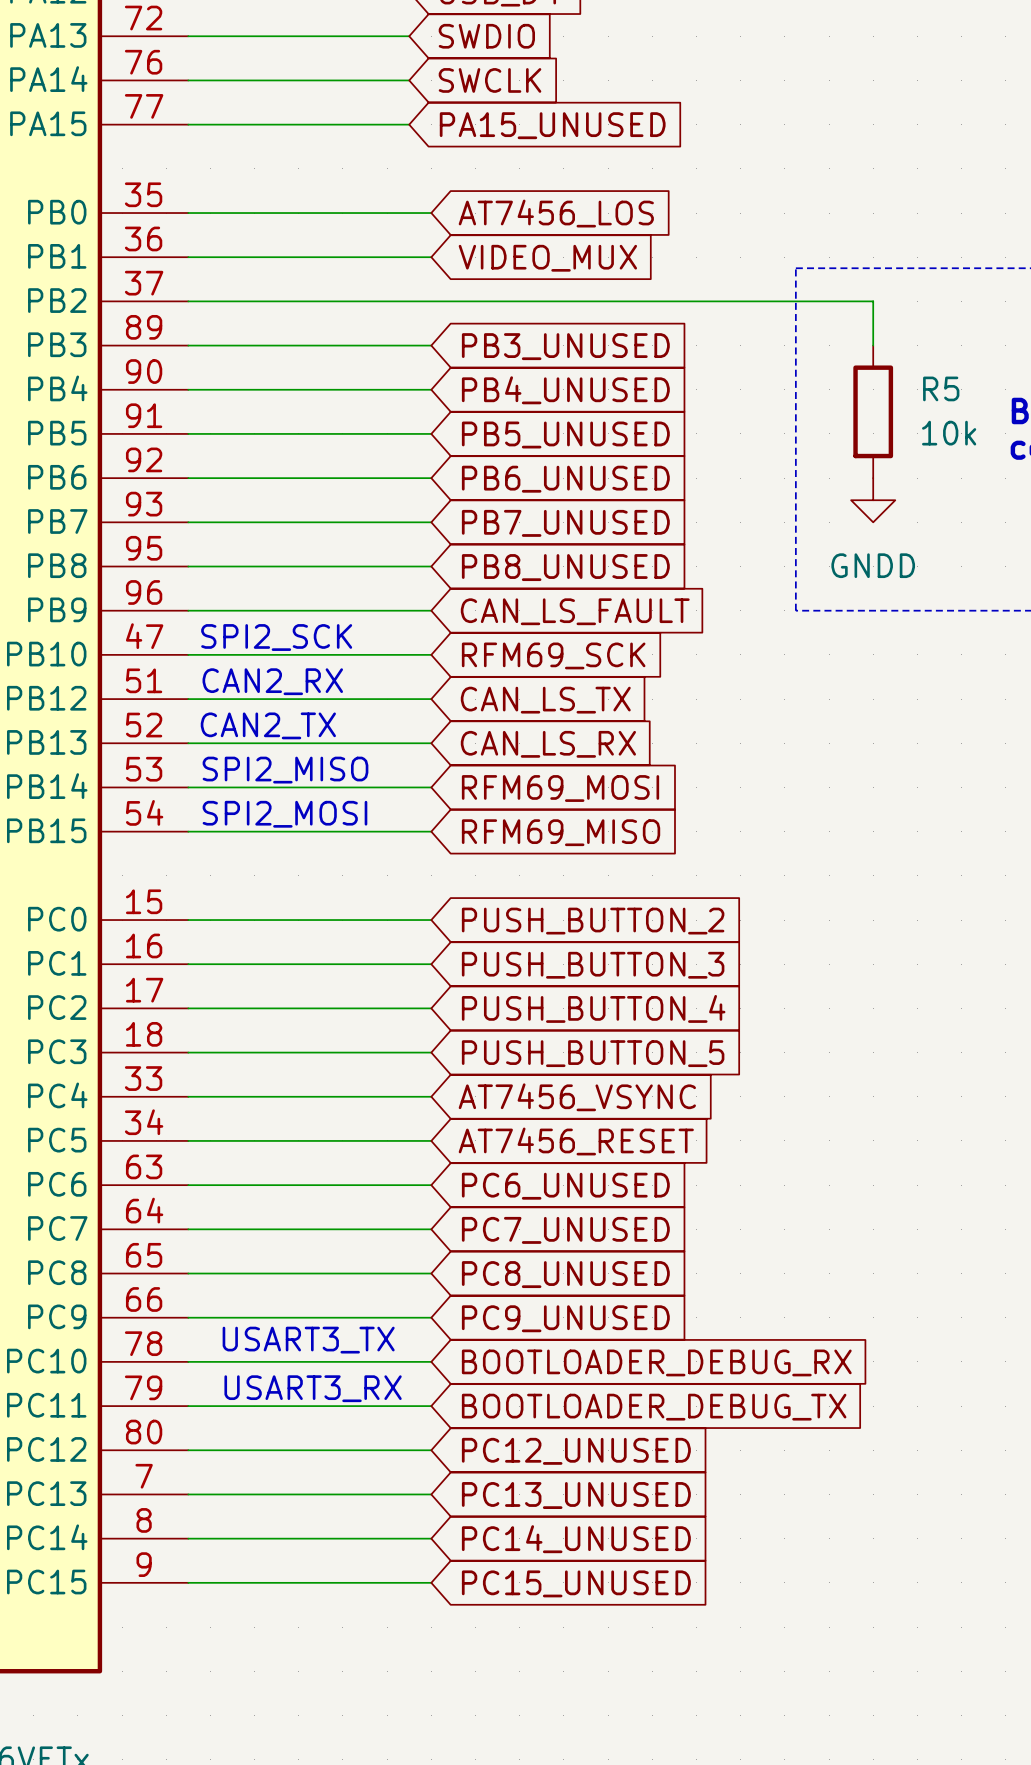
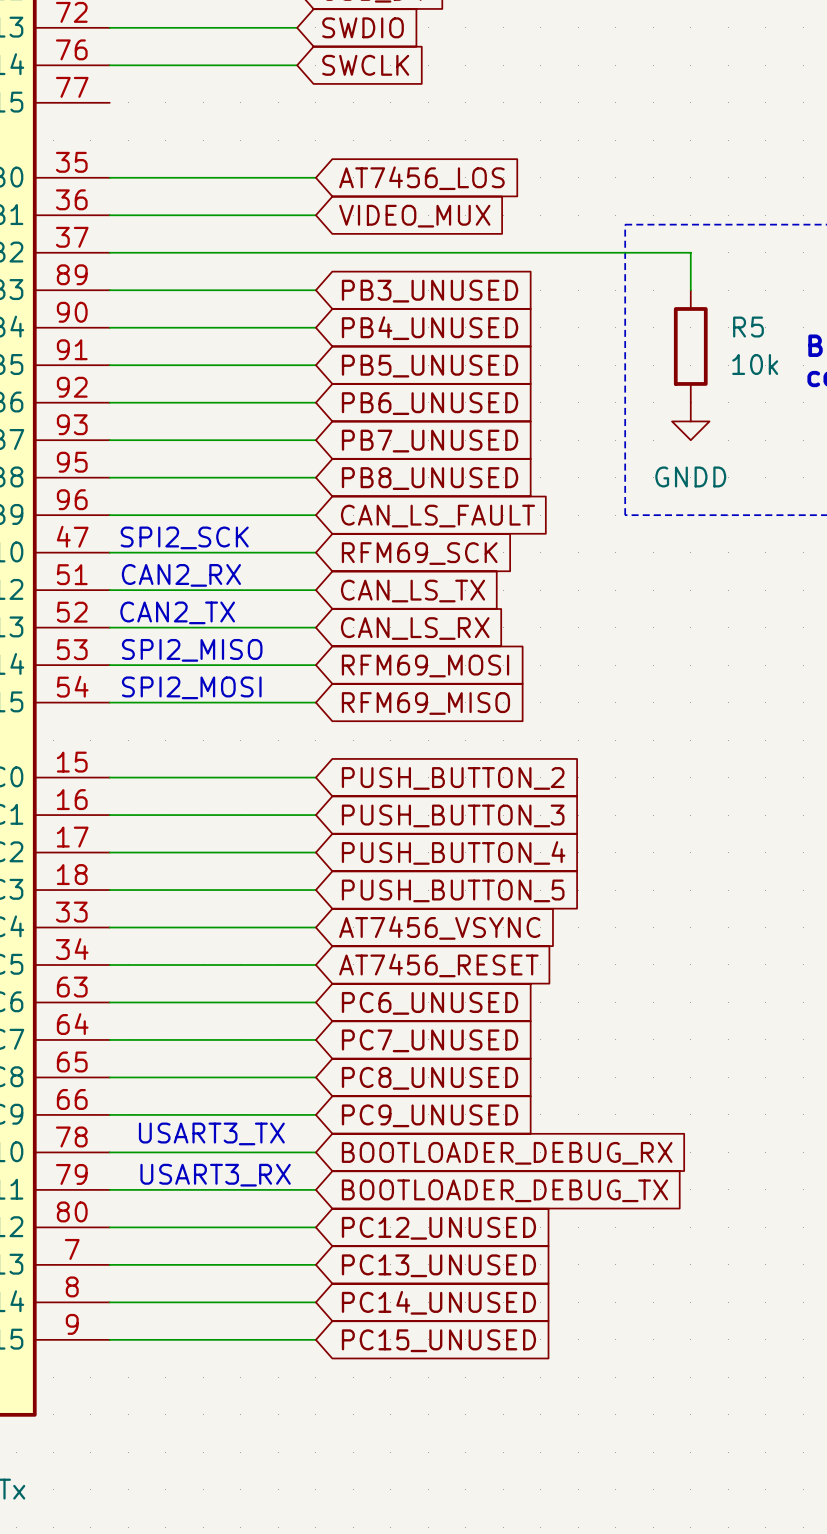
wire: (188, 124) (409, 124) -> none
global label: PA15_UNUSED (552, 125) -> none

